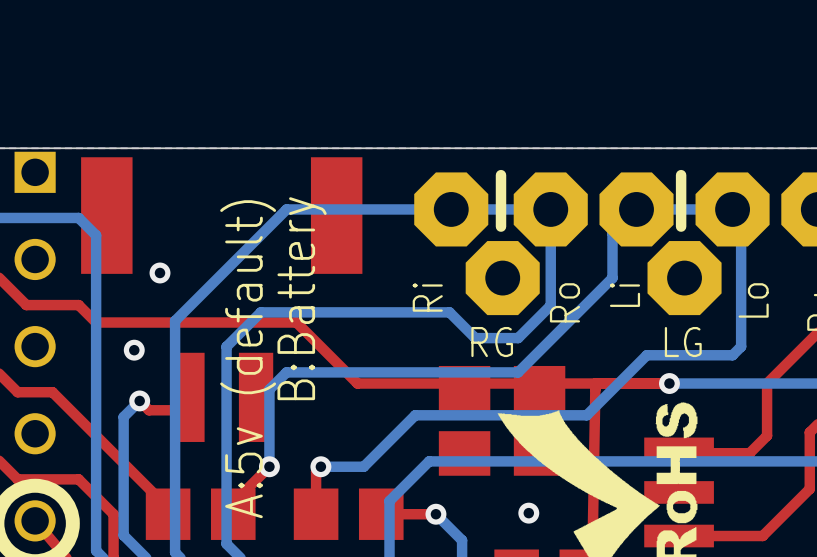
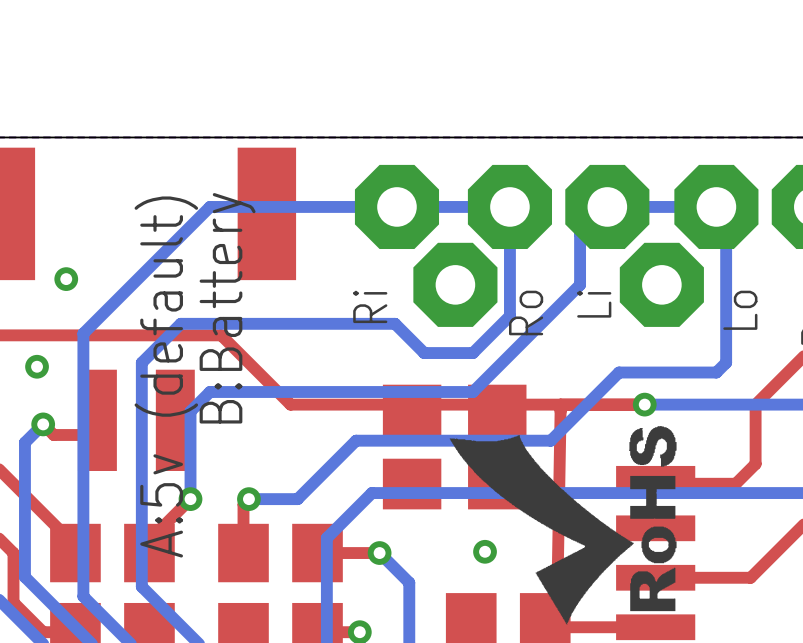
line: (501, 175) (501, 226) -> none
line: (681, 175) (681, 226) -> none
text: RG (492, 342) -> none
text: LG (683, 342) -> none

